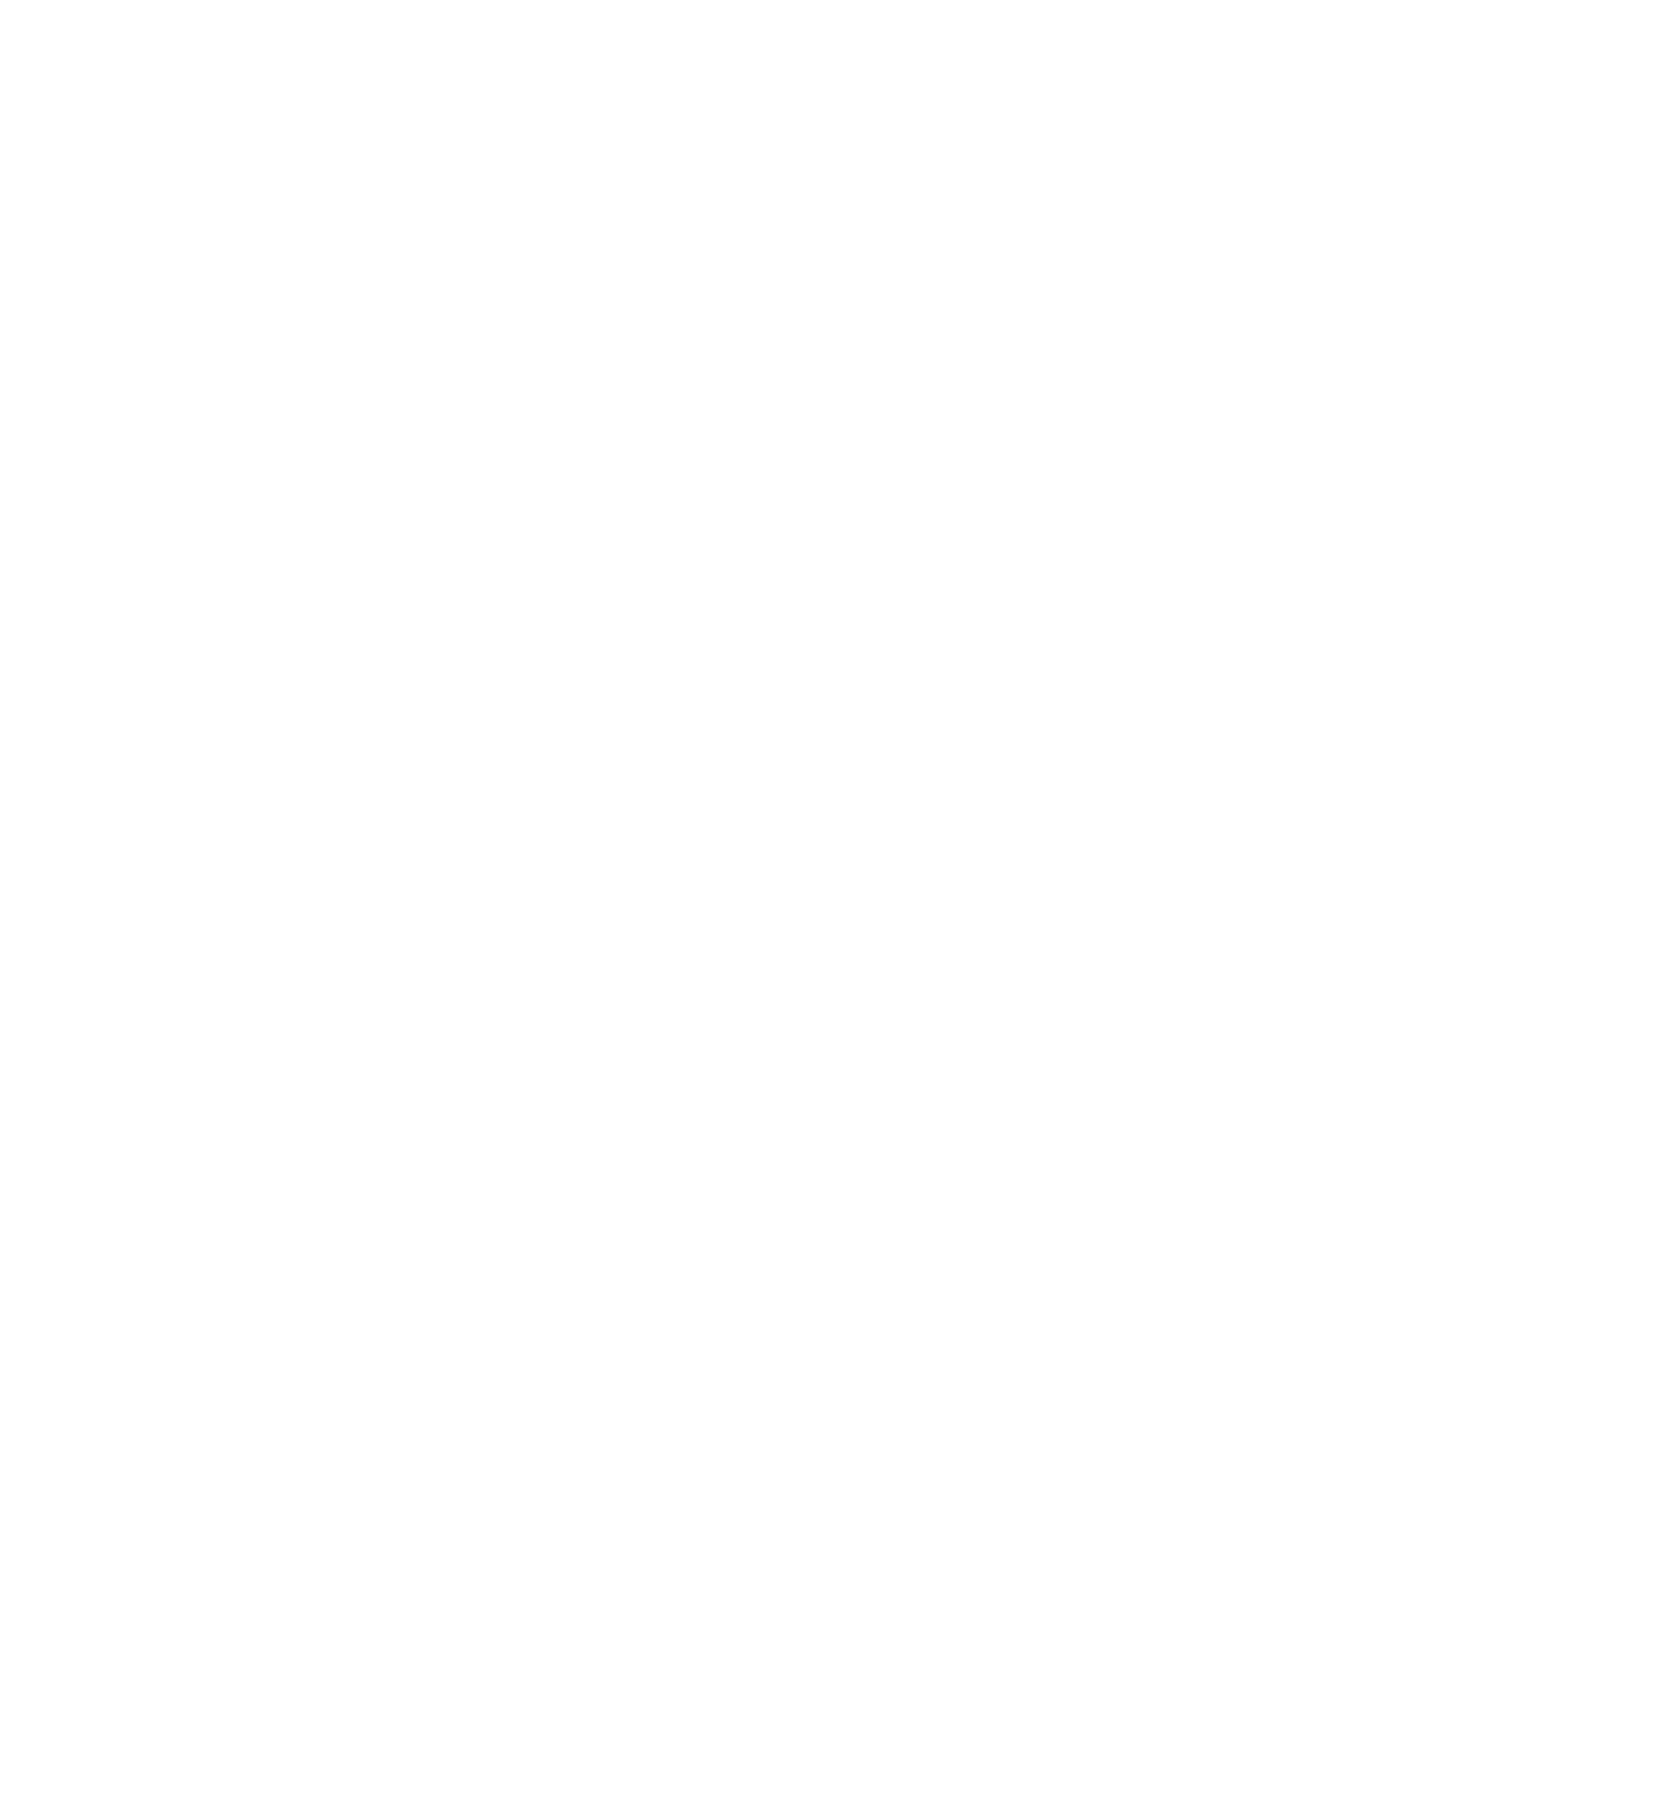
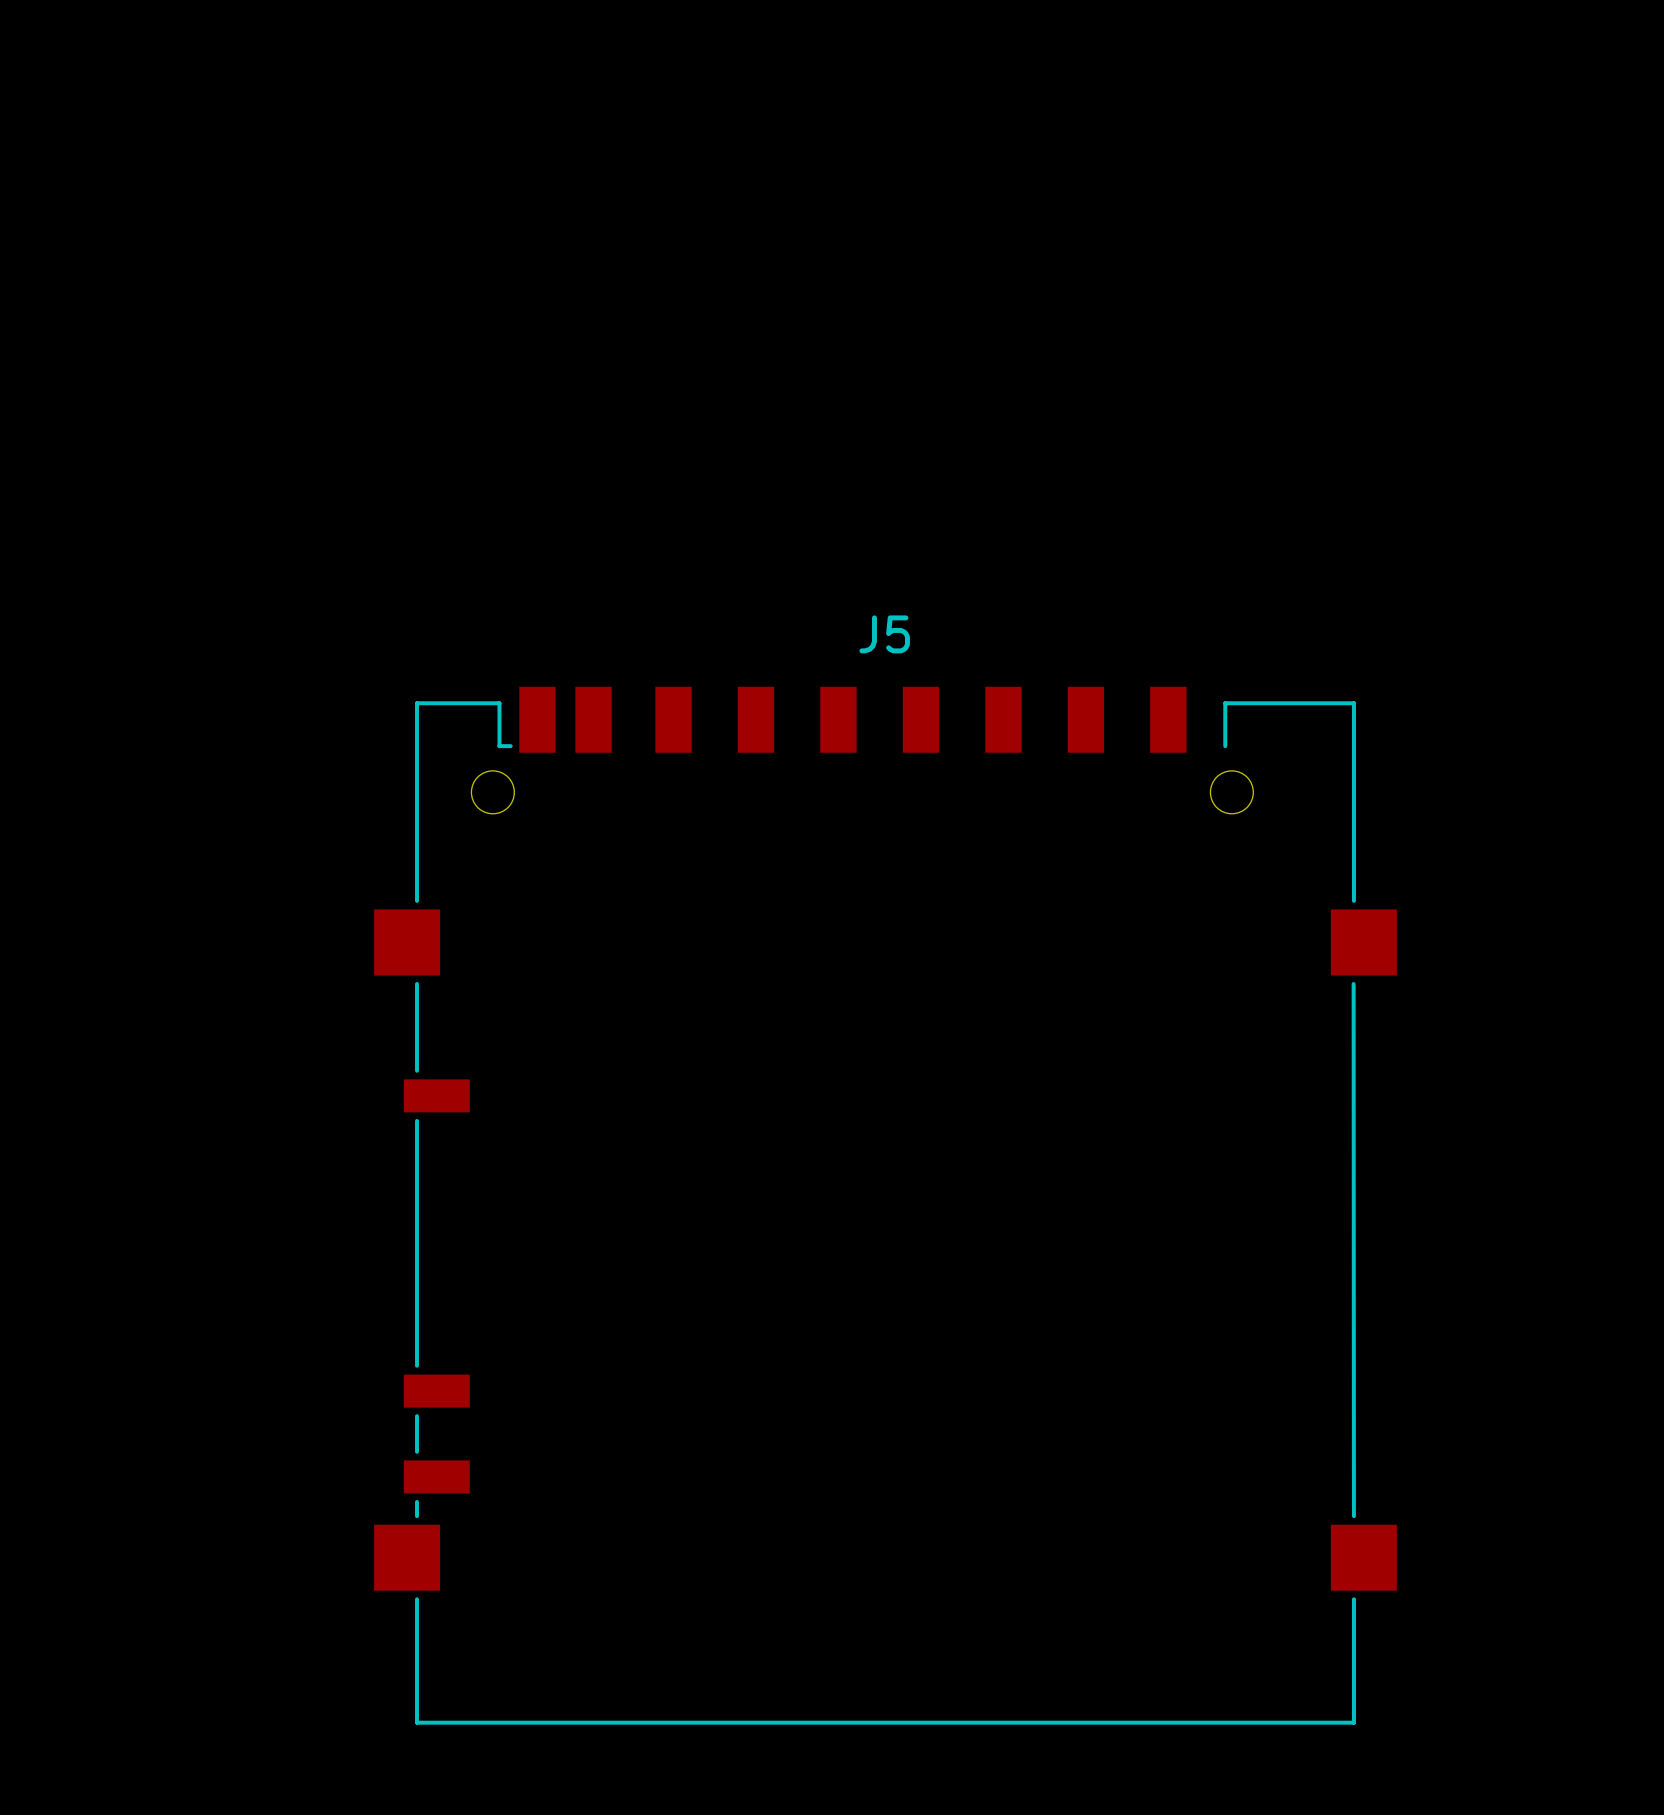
J5: none -> (885, 1205)

